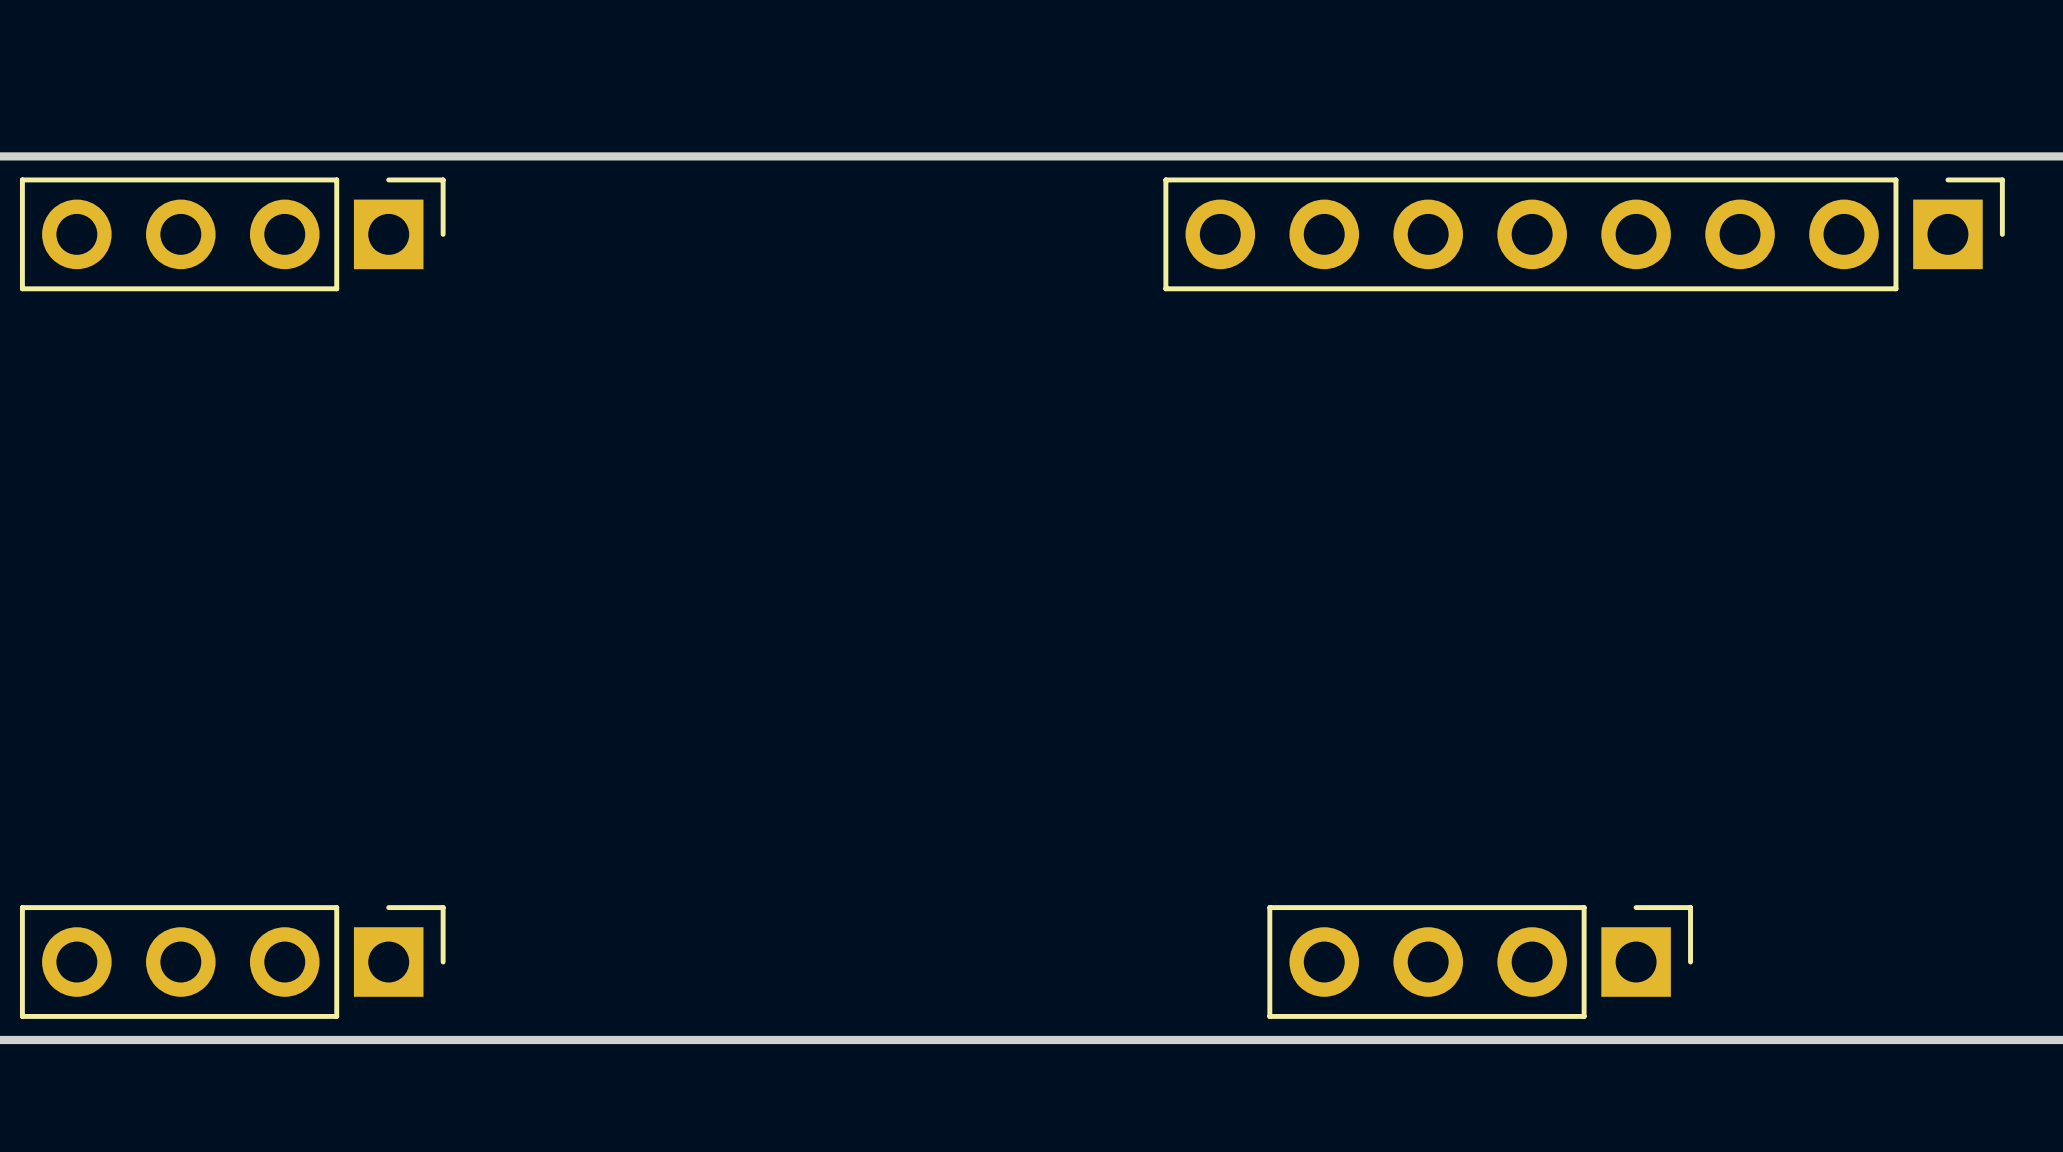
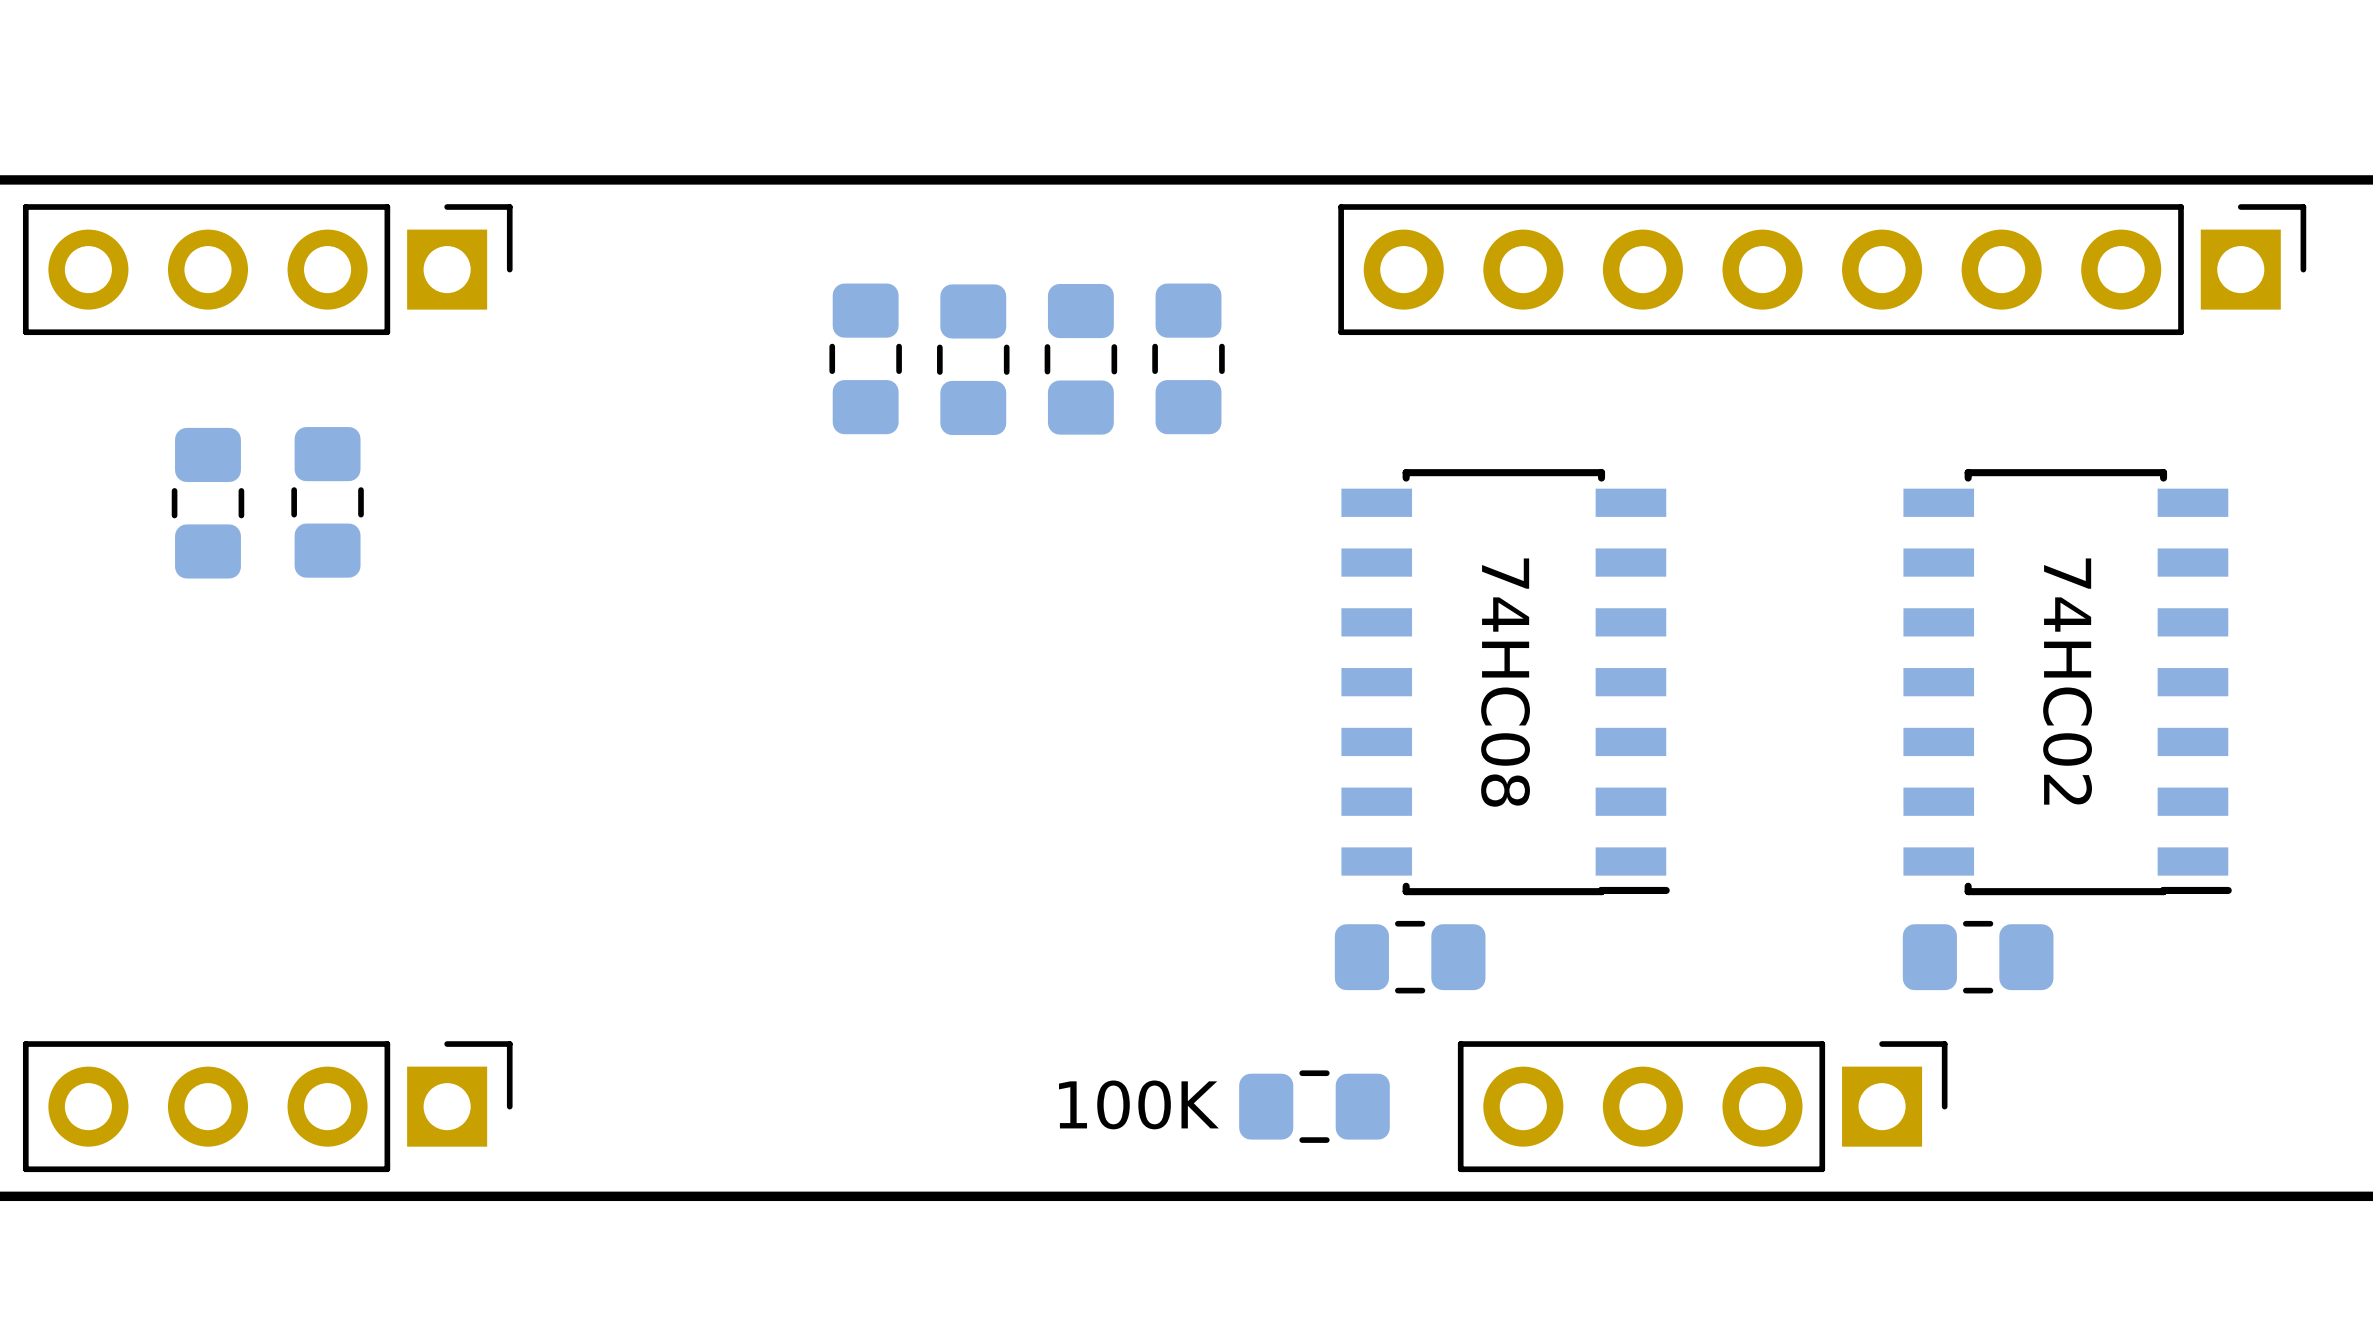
part: none -> (865, 358)
part: none -> (1188, 358)
part: none -> (973, 359)
part: none -> (1080, 359)
part: none -> (327, 502)
part: none -> (207, 503)
part: none -> 74HC08 (1505, 682)
part: none -> 74HC02 (2067, 682)
part: none -> (1410, 957)
part: none -> (1978, 957)
part: none -> 100K (1314, 1106)

